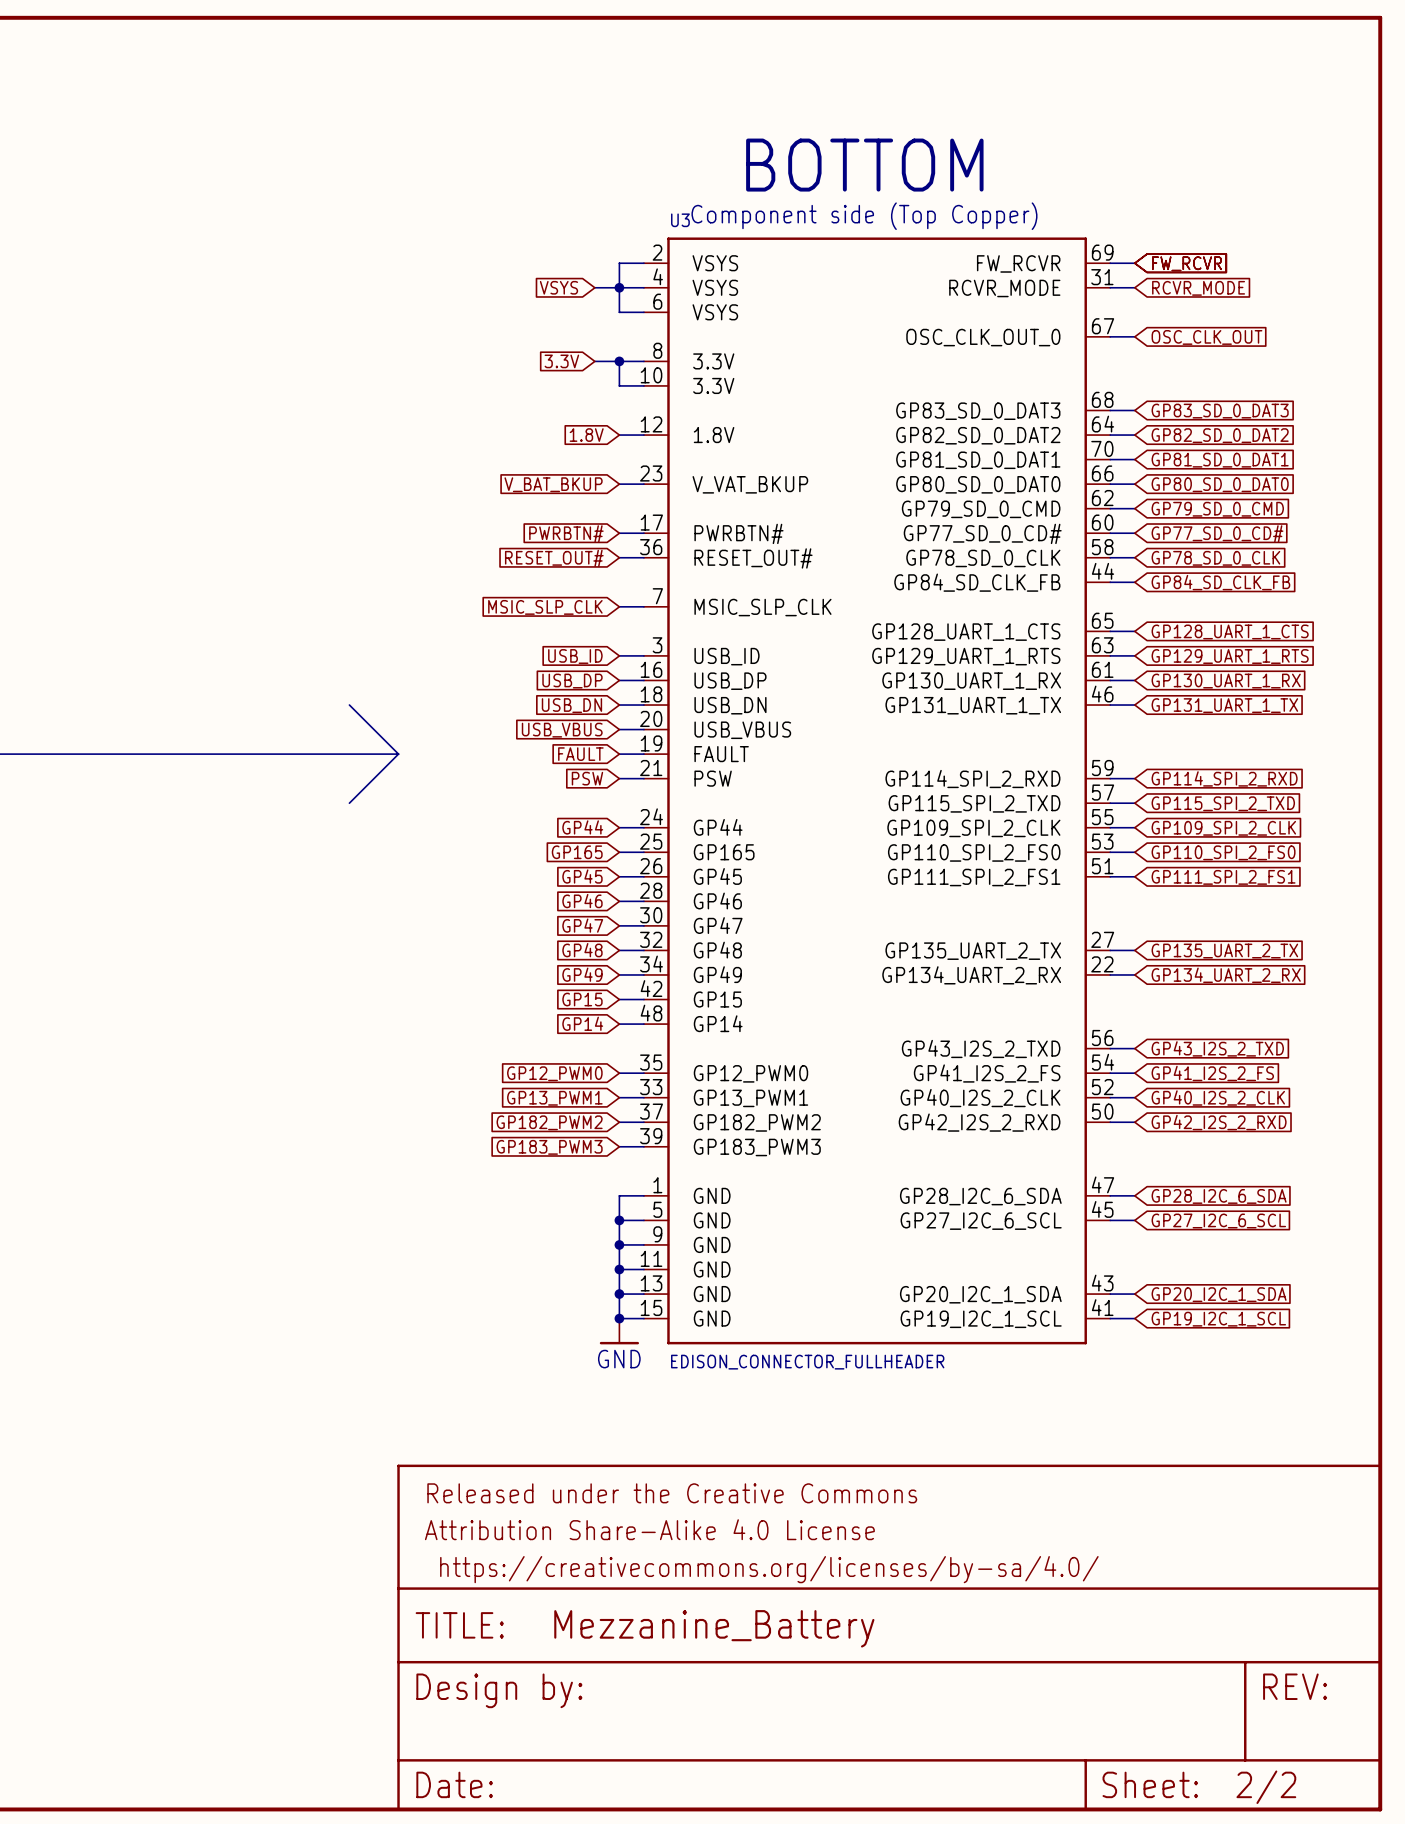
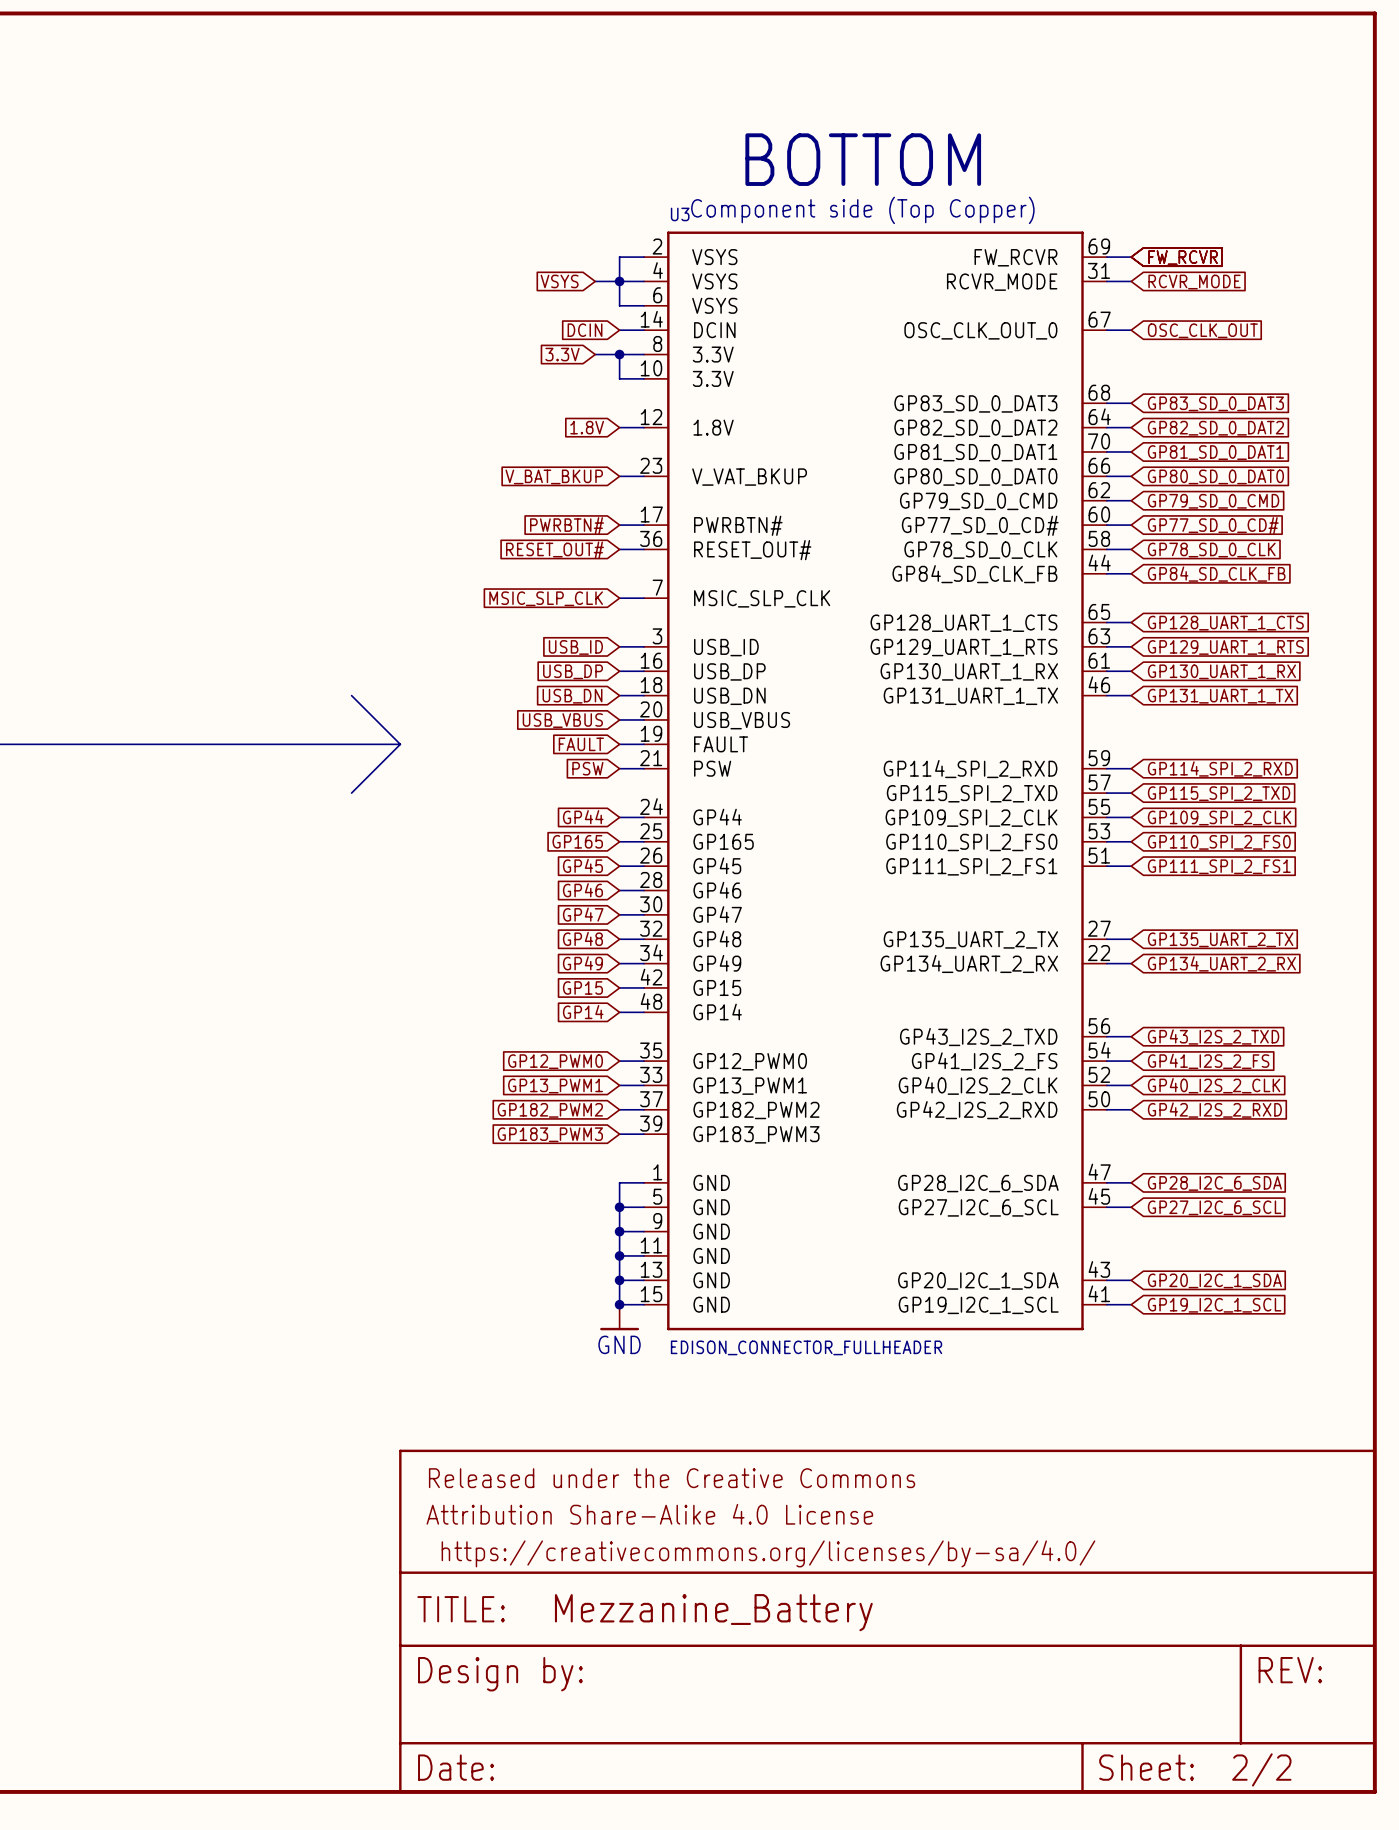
U3 symbol: [643, 237, 1111, 1345] -> [643, 231, 1107, 1331]
global label: none -> DCIN (585, 330)
wire: none -> (619, 330) (643, 330)

